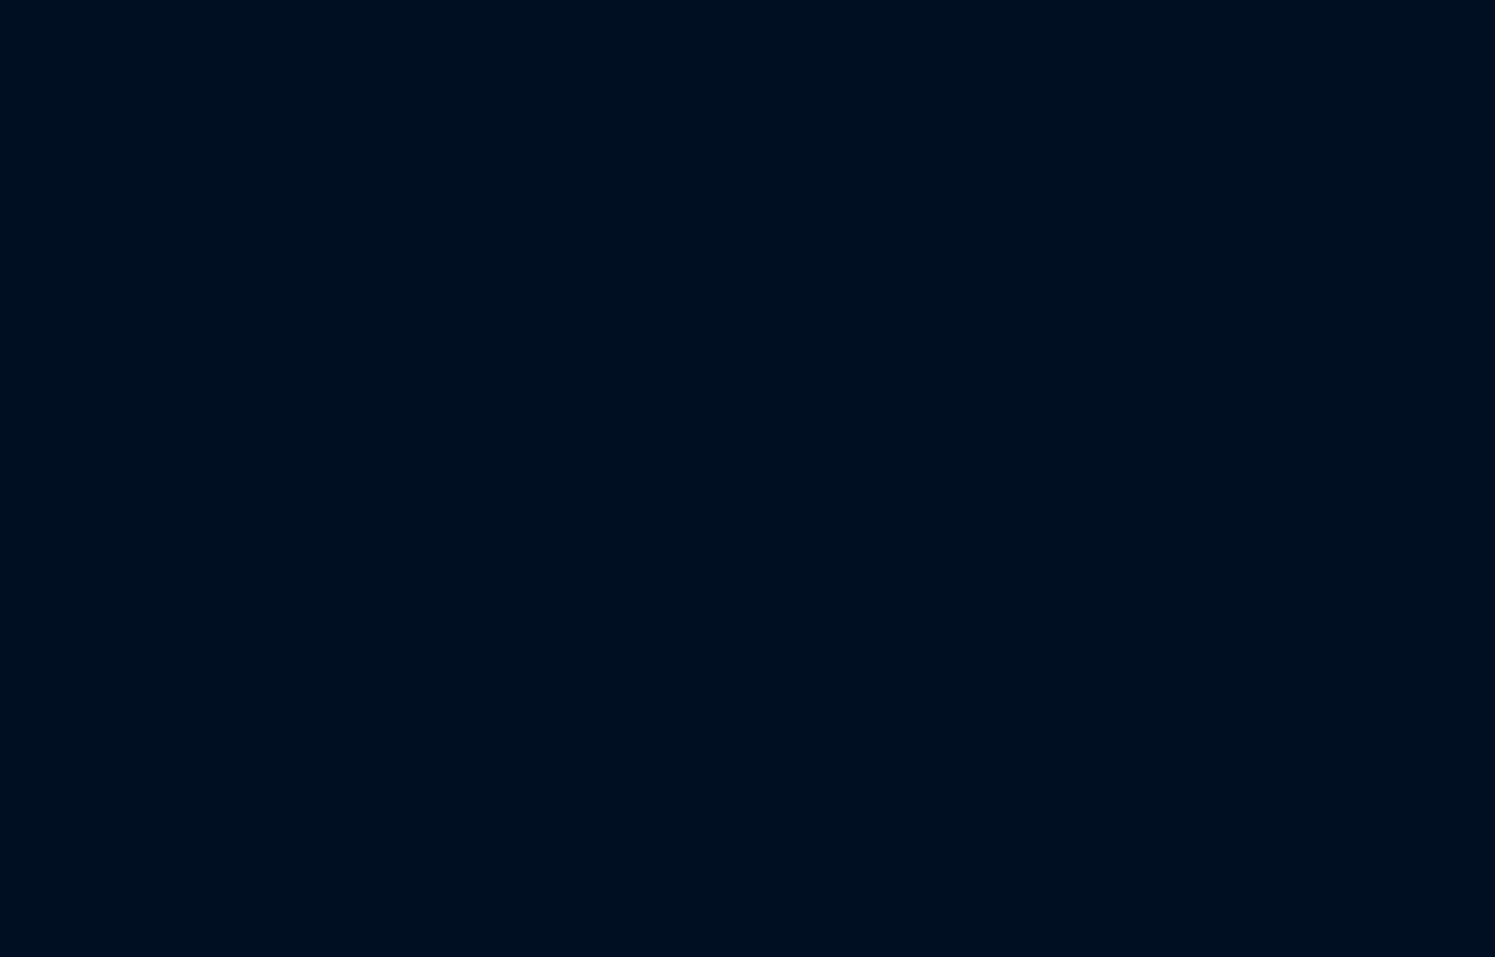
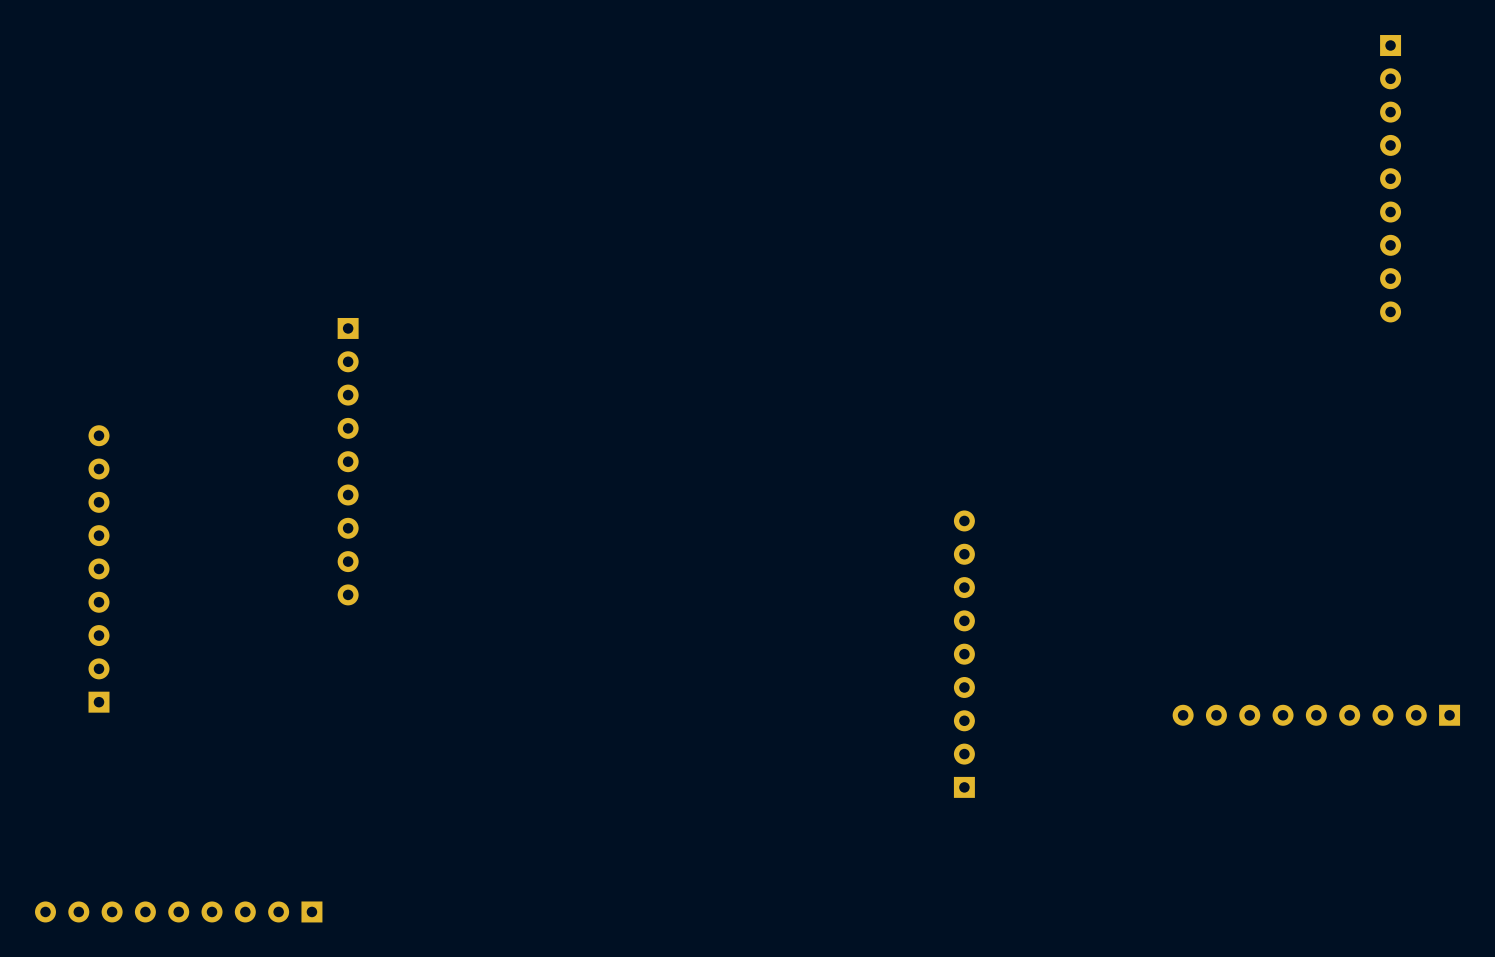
part: none -> (1390, 178)
part: none -> (348, 461)
part: none -> (99, 568)
part: none -> (964, 654)
part: none -> (1316, 715)
part: none -> (178, 911)

